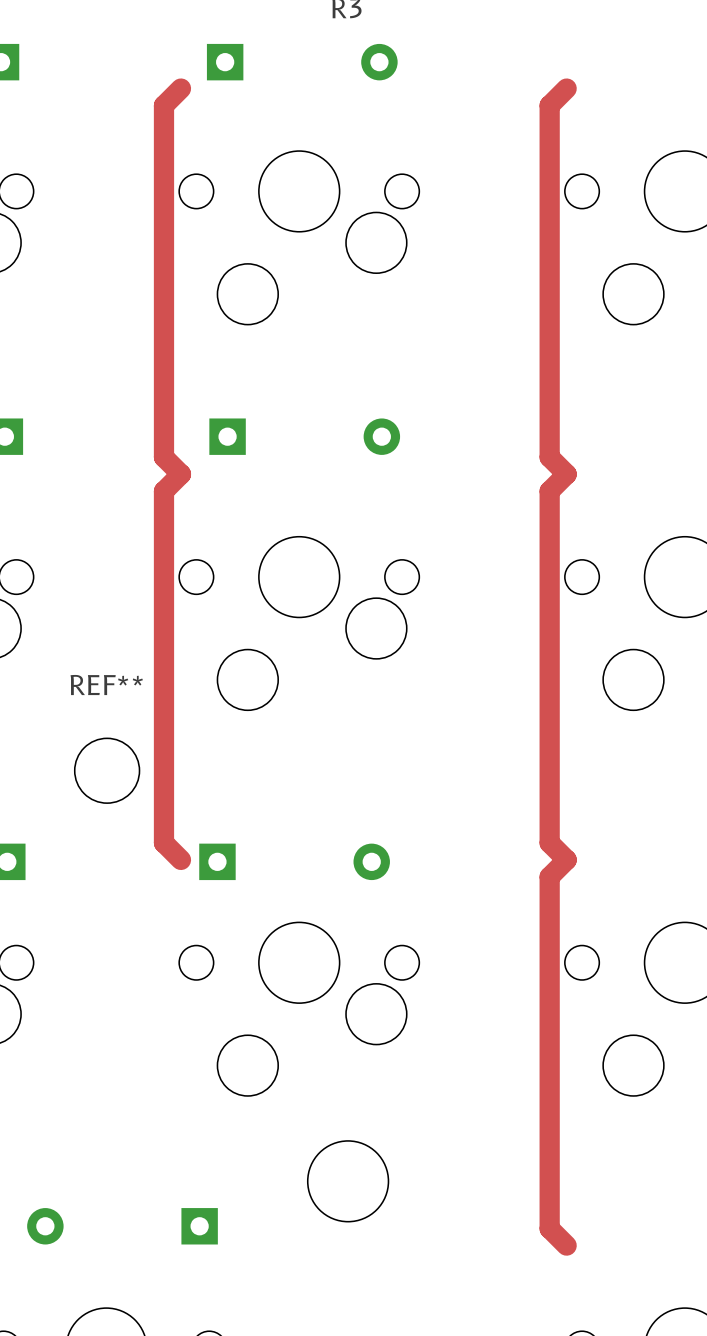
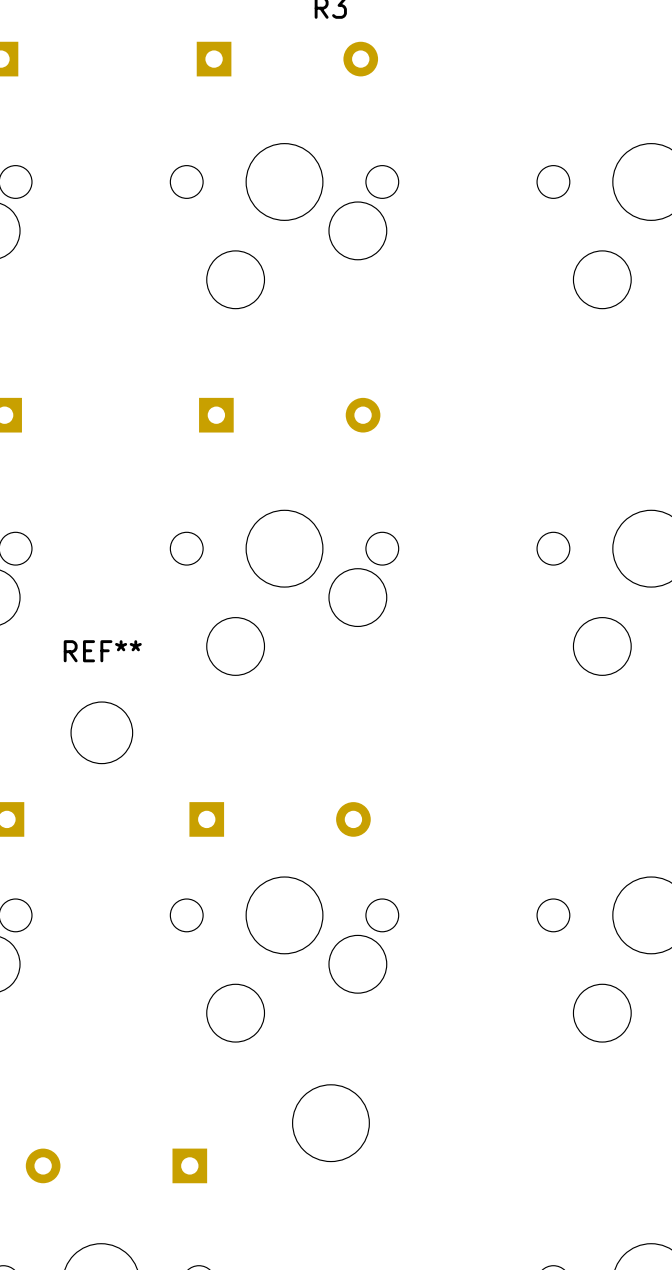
track: (180, 88) (163, 105) (163, 457) (180, 474) (163, 491) (163, 842) (180, 859) -> none
track: (566, 88) (549, 105) (549, 457) (566, 474) (549, 491) (549, 842) (566, 859) (549, 876) (549, 1228) (566, 1245) -> none

